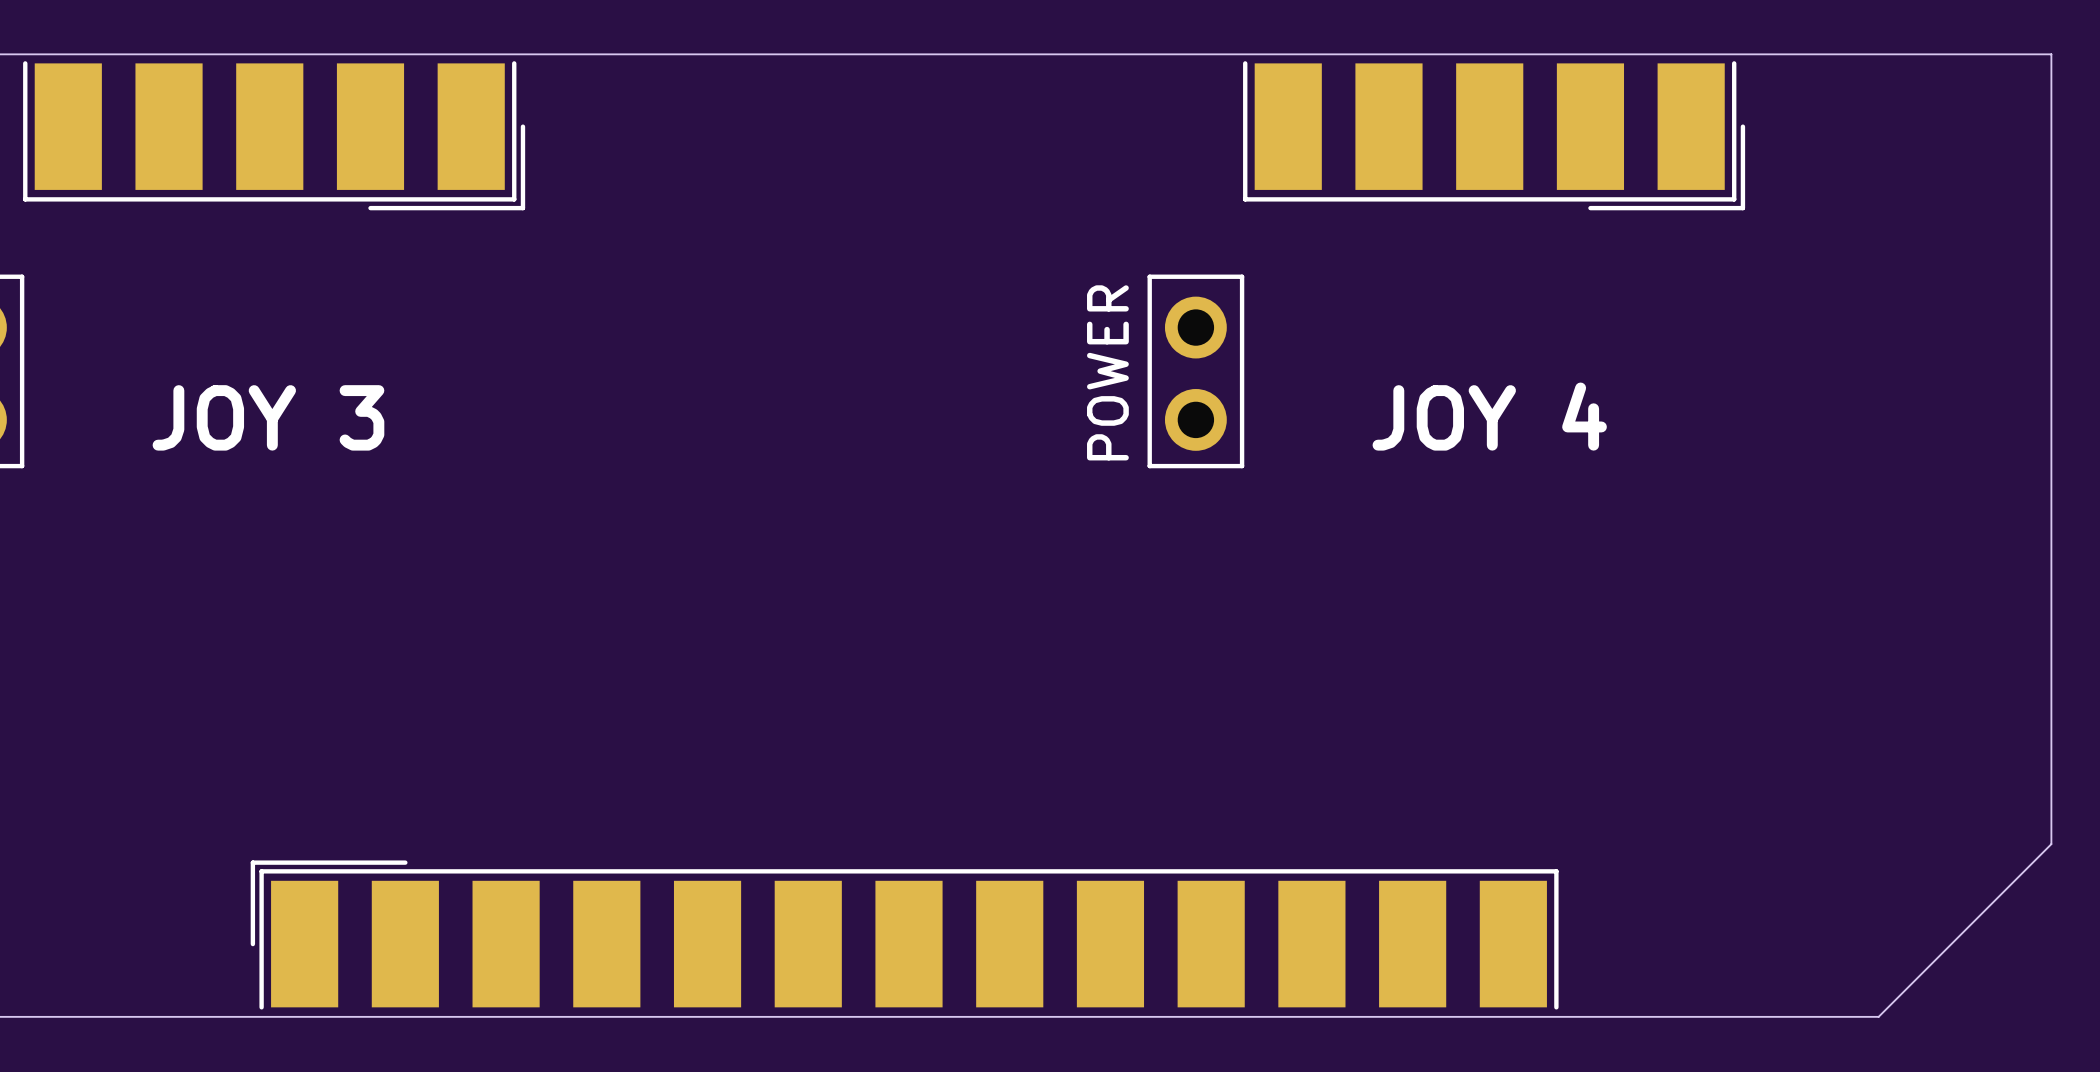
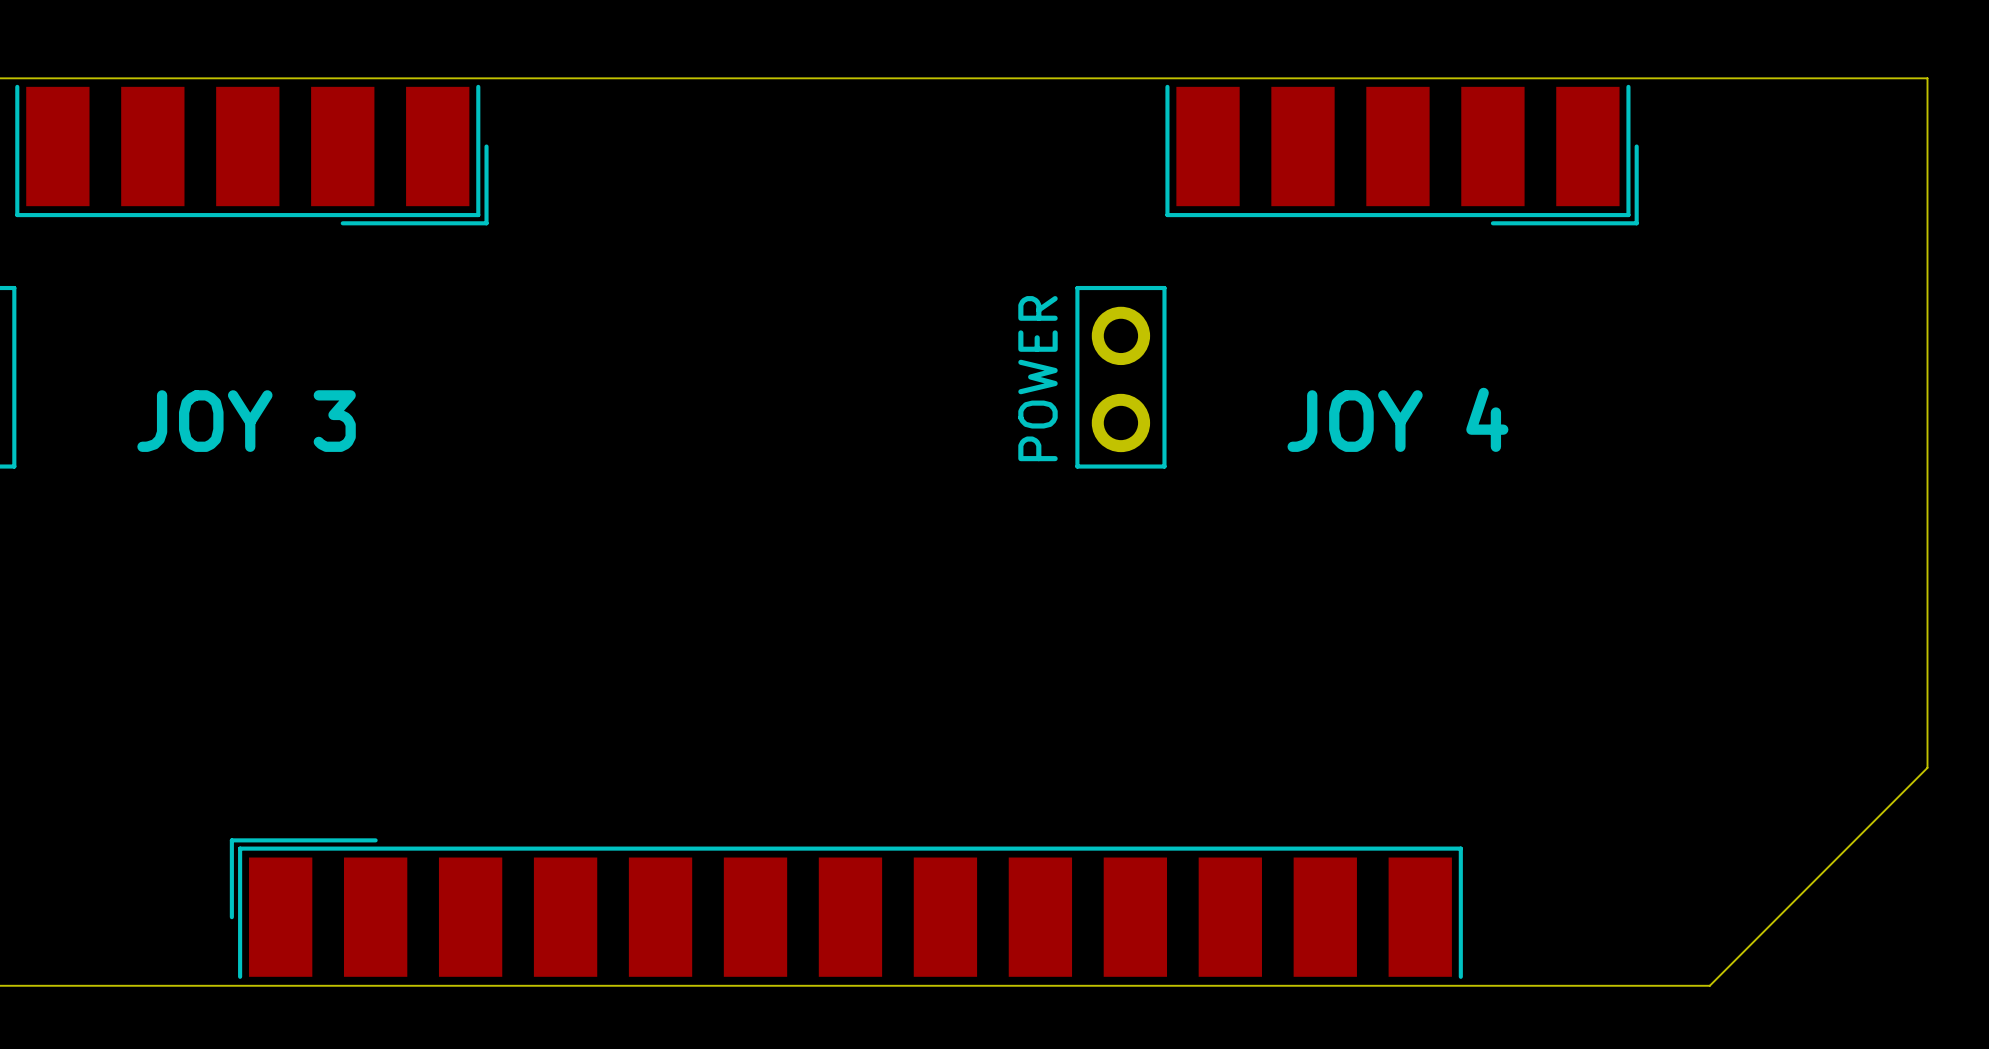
board edge: (2051, 785) (2051, 844) (1878, 1016) (1820, 1016) -> (1927, 767) (1709, 985)

